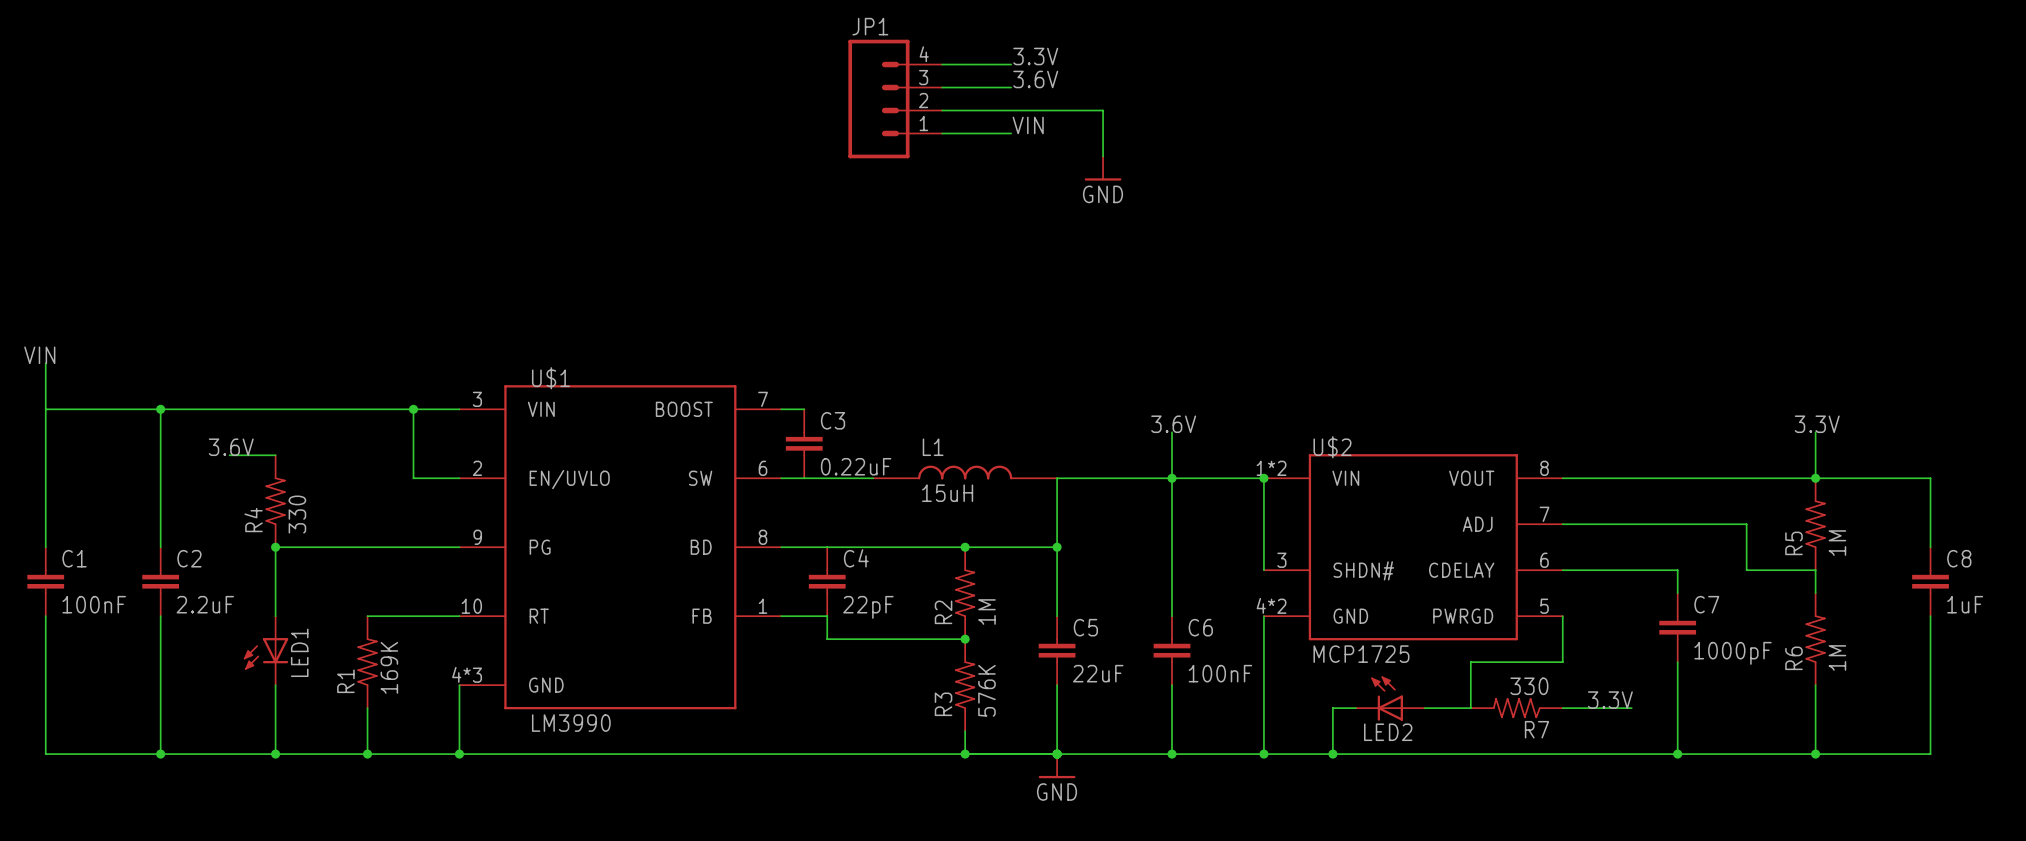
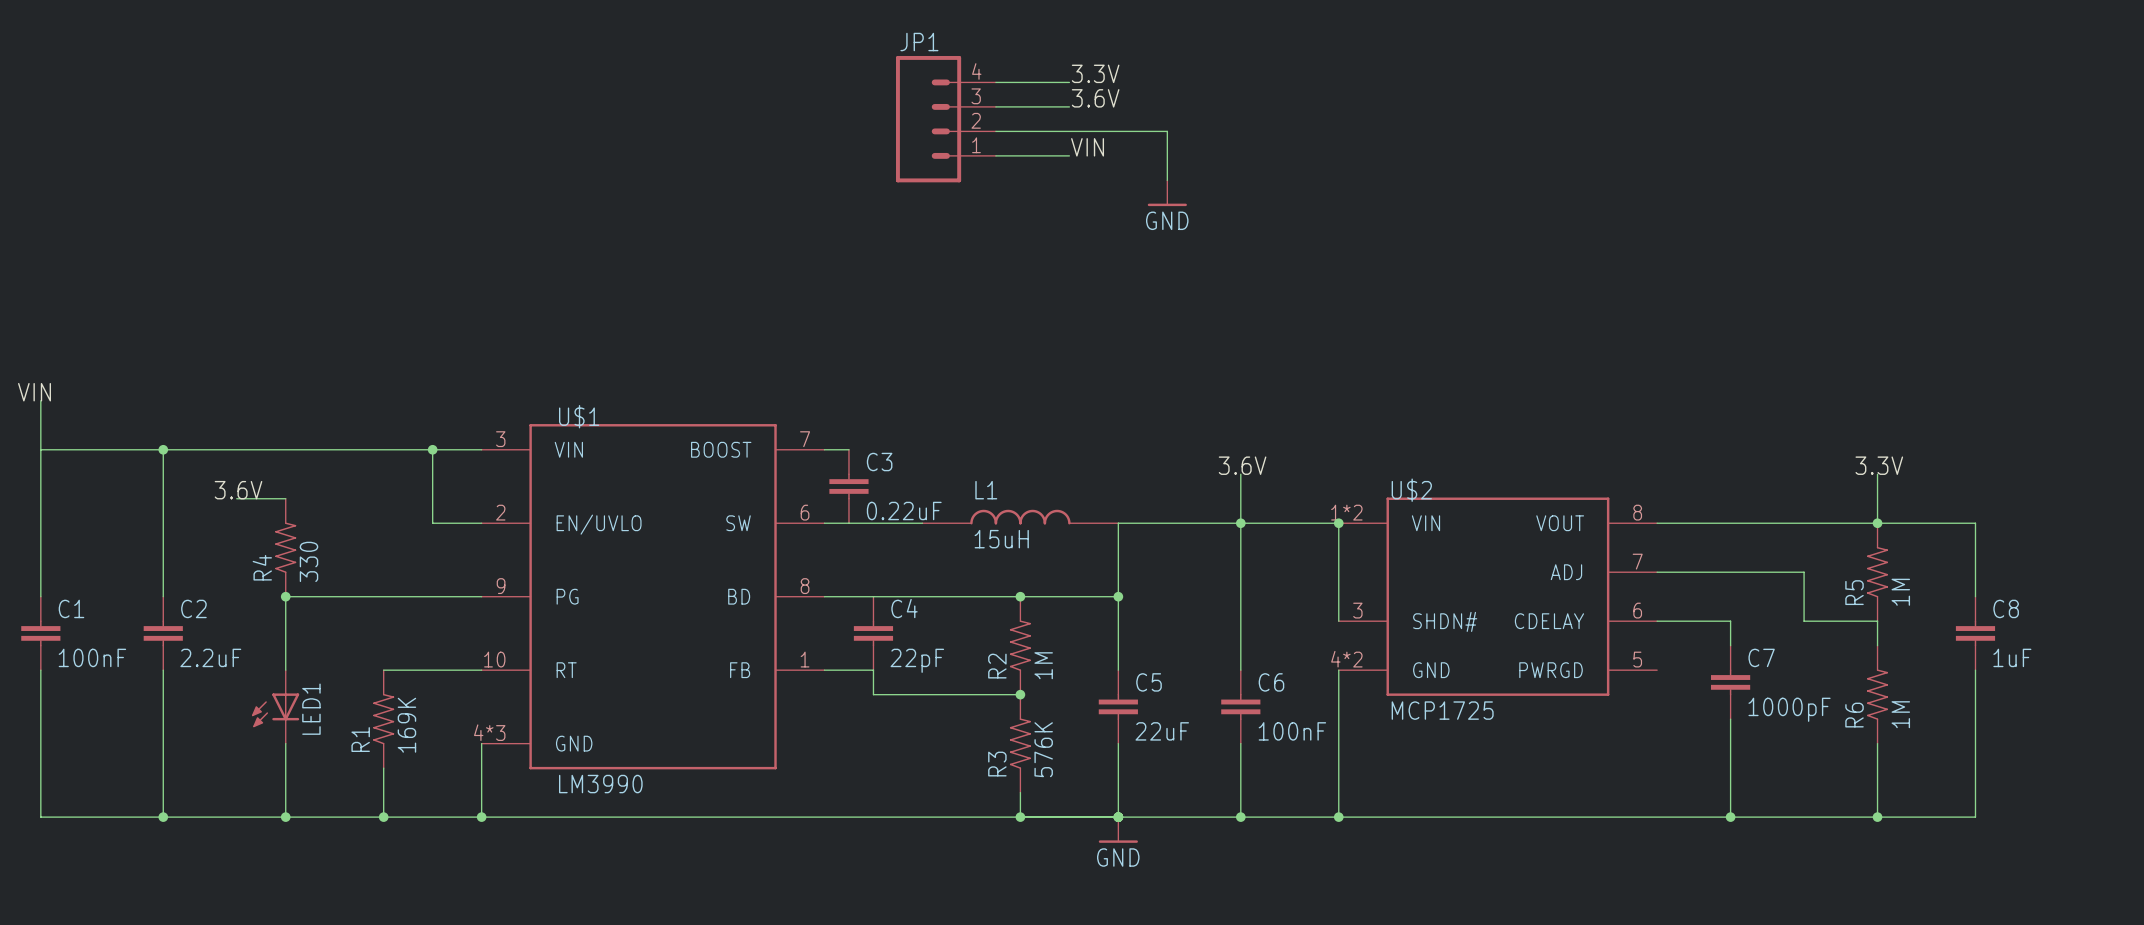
label position: 3.3V (1817, 424) -> 3.3V (1879, 465)
wire: (1815, 432) (1815, 478) -> (1877, 474) (1877, 523)
junction position: (1815, 478) -> (1877, 523)
wire: (1861, 478) (1930, 478) (1930, 547) -> (1975, 523) (1975, 596)
wire: (1700, 524) (1746, 524) (1746, 570) -> (1804, 572) (1804, 621) (1853, 621)
R5 position: (1815, 524) -> (1877, 572)
wire: (1631, 570) (1677, 570) (1677, 593) -> (1730, 621) (1730, 645)
wire: (1769, 570) (1815, 570) (1815, 593) -> (1877, 621) (1877, 645)
C8 position: (1930, 581) -> (1975, 633)
wire: (1562, 616) (1562, 662) (1470, 662) (1470, 708) (1424, 708) -> none
wire: (1930, 616) (1930, 754) (1861, 754) -> (1975, 670) (1975, 817)
C7 position: (1677, 627) -> (1730, 682)
R6 position: (1815, 639) -> (1877, 694)
wire: (1677, 662) (1677, 754) -> (1730, 719) (1730, 817)
wire: (1815, 685) (1815, 754) -> (1877, 743) (1877, 817)
LED2: (1390, 698) -> none
label: 3.3V (1610, 700) -> none
wire: (1355, 708) (1332, 708) (1332, 754) -> none
R7: 330 (1516, 708) -> none
wire: (1562, 708) (1631, 708) -> none
junction: (1332, 754) -> none
junction: none -> (1730, 817)
junction: (1677, 754) -> none
junction: none -> (1877, 817)
junction: (1815, 754) -> none

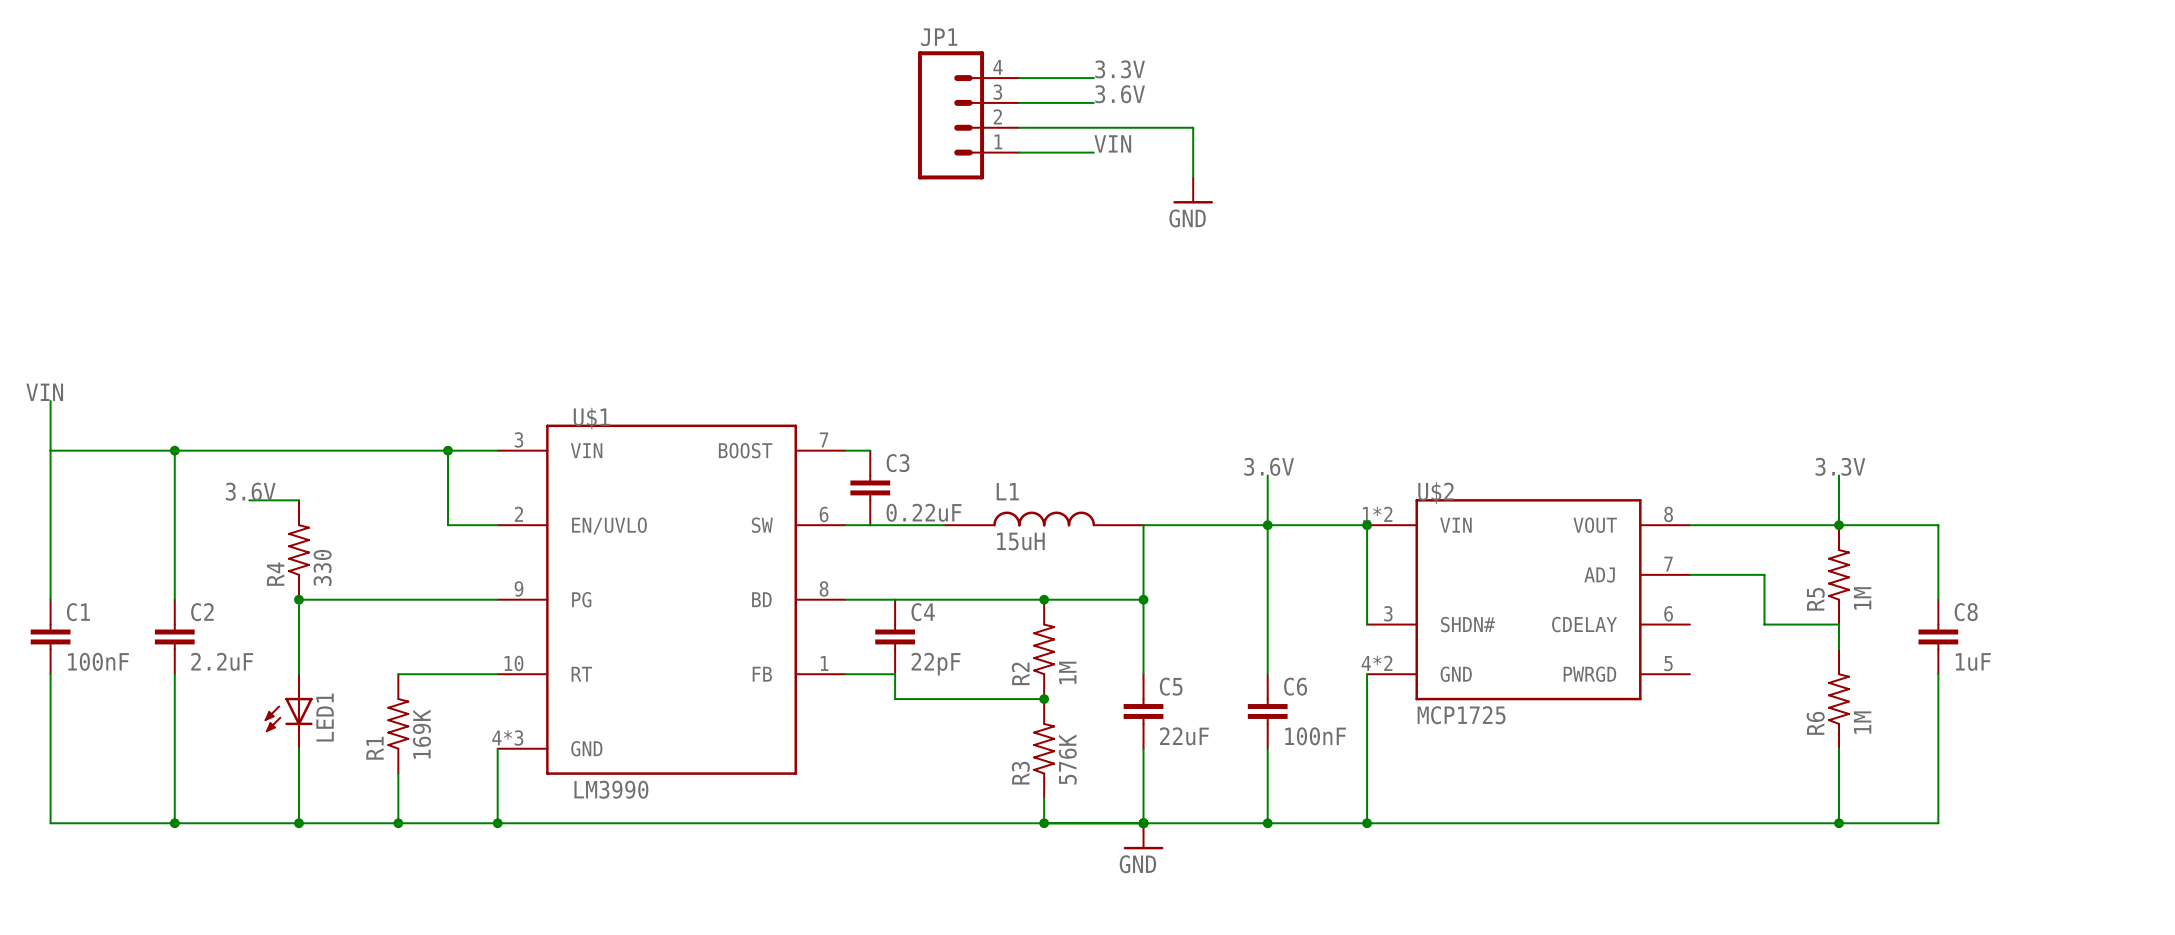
label position: 3.3V (1879, 465) -> 3.3V (1840, 466)
wire: (1877, 474) (1877, 523) -> (1839, 475) (1839, 525)
junction: none -> (1839, 525)
junction: (1877, 523) -> none
wire: (1902, 523) (1975, 523) (1975, 596) -> (1938, 525) (1938, 599)
wire: (1730, 572) (1804, 572) (1804, 621) (1877, 621) (1877, 645) -> (1764, 574) (1764, 624) (1839, 624) (1839, 649)
R5 position: (1877, 572) -> (1839, 574)
wire: (1657, 621) (1730, 621) (1730, 645) -> none
C8 position: (1975, 633) -> (1938, 636)
wire: (1975, 670) (1975, 817) (1902, 817) -> (1938, 674) (1938, 823)
C7: 1000pF (1730, 682) -> none
R6 position: (1877, 694) -> (1839, 699)
wire: (1730, 719) (1730, 817) -> none
wire: (1877, 743) (1877, 817) -> (1839, 748) (1839, 823)
junction: (1730, 817) -> none
junction: none -> (1839, 823)
junction: (1877, 817) -> none

